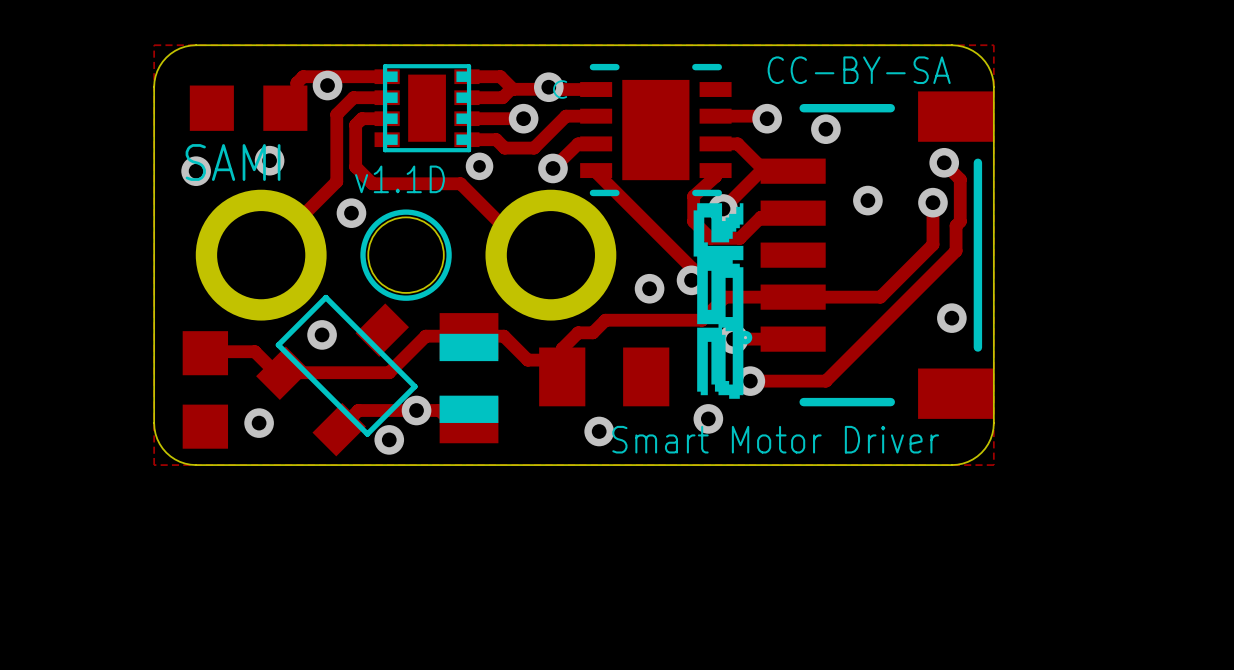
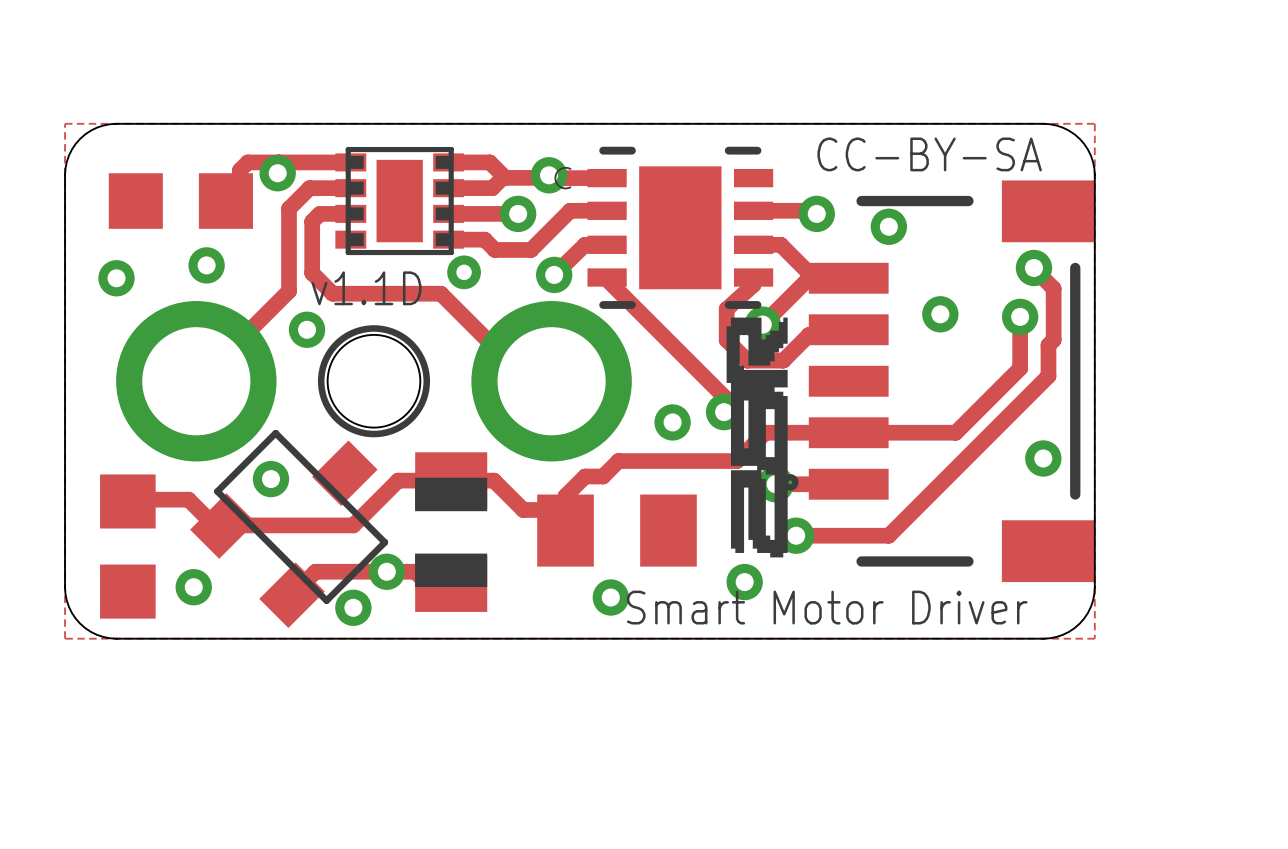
text: SAMI (233, 162) -> none

